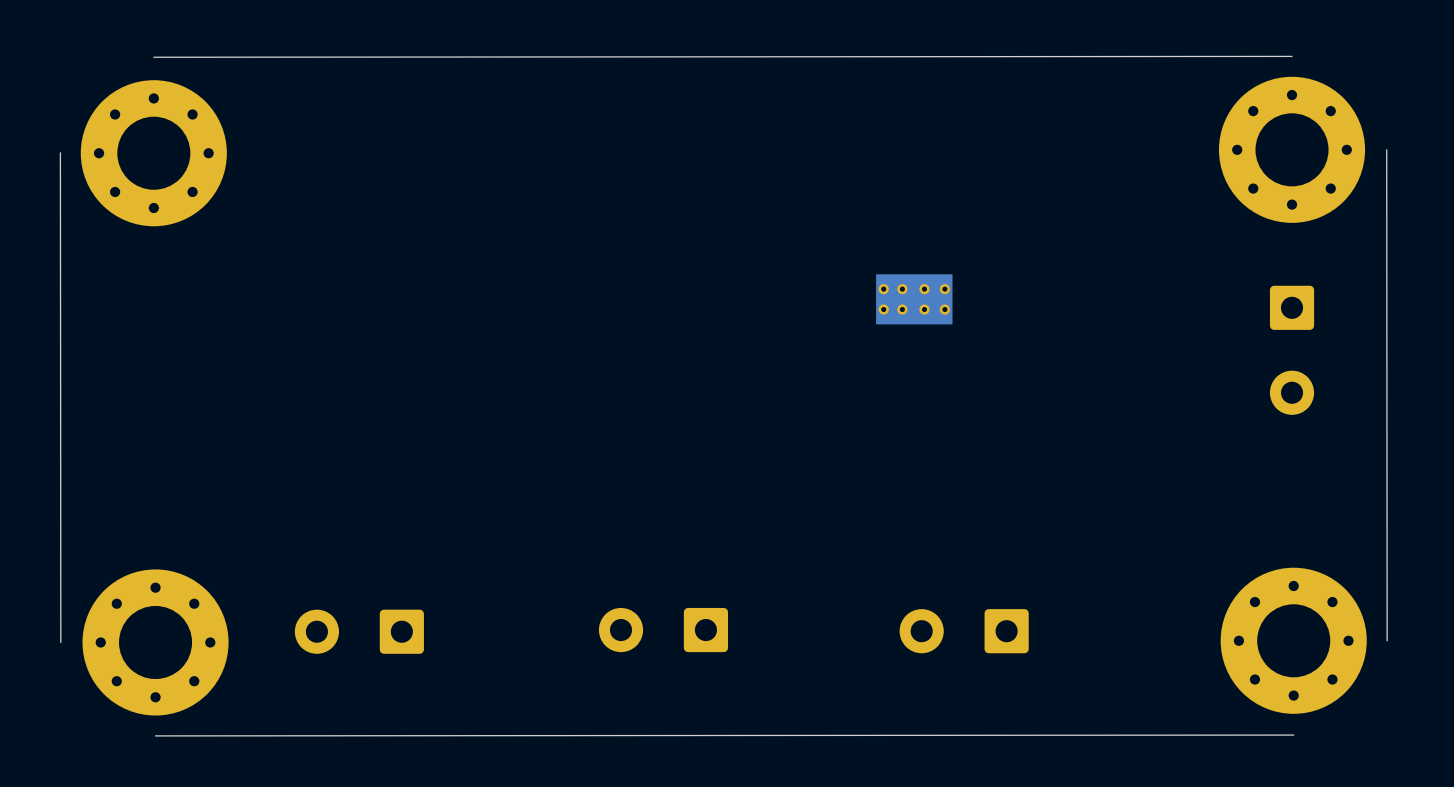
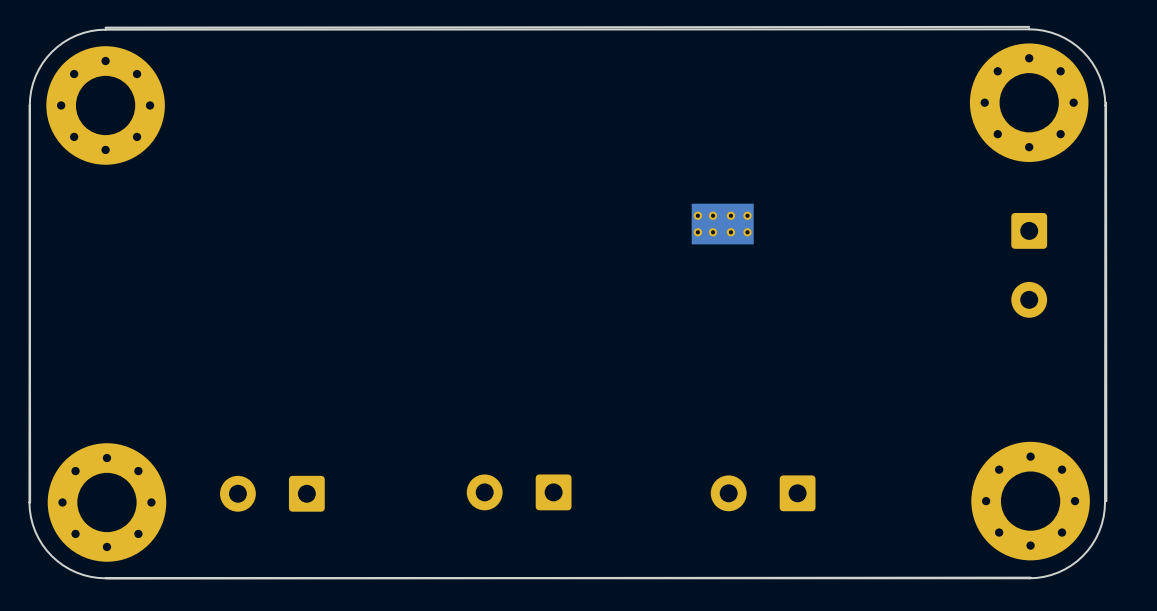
board edge: none -> (1029, 29) (105, 29) (83, 32) (69, 38) (51, 51) (42, 63) (35, 76) (30, 98) (29, 502) (30, 517) (38, 538) (51, 556) (69, 569) (90, 576) (105, 578) (1029, 578) (1051, 575) (1064, 569) (1077, 561) (1092, 544) (1099, 531) (1104, 509) (1105, 98) (1096, 69) (1077, 46) (1058, 35) (1029, 29)

